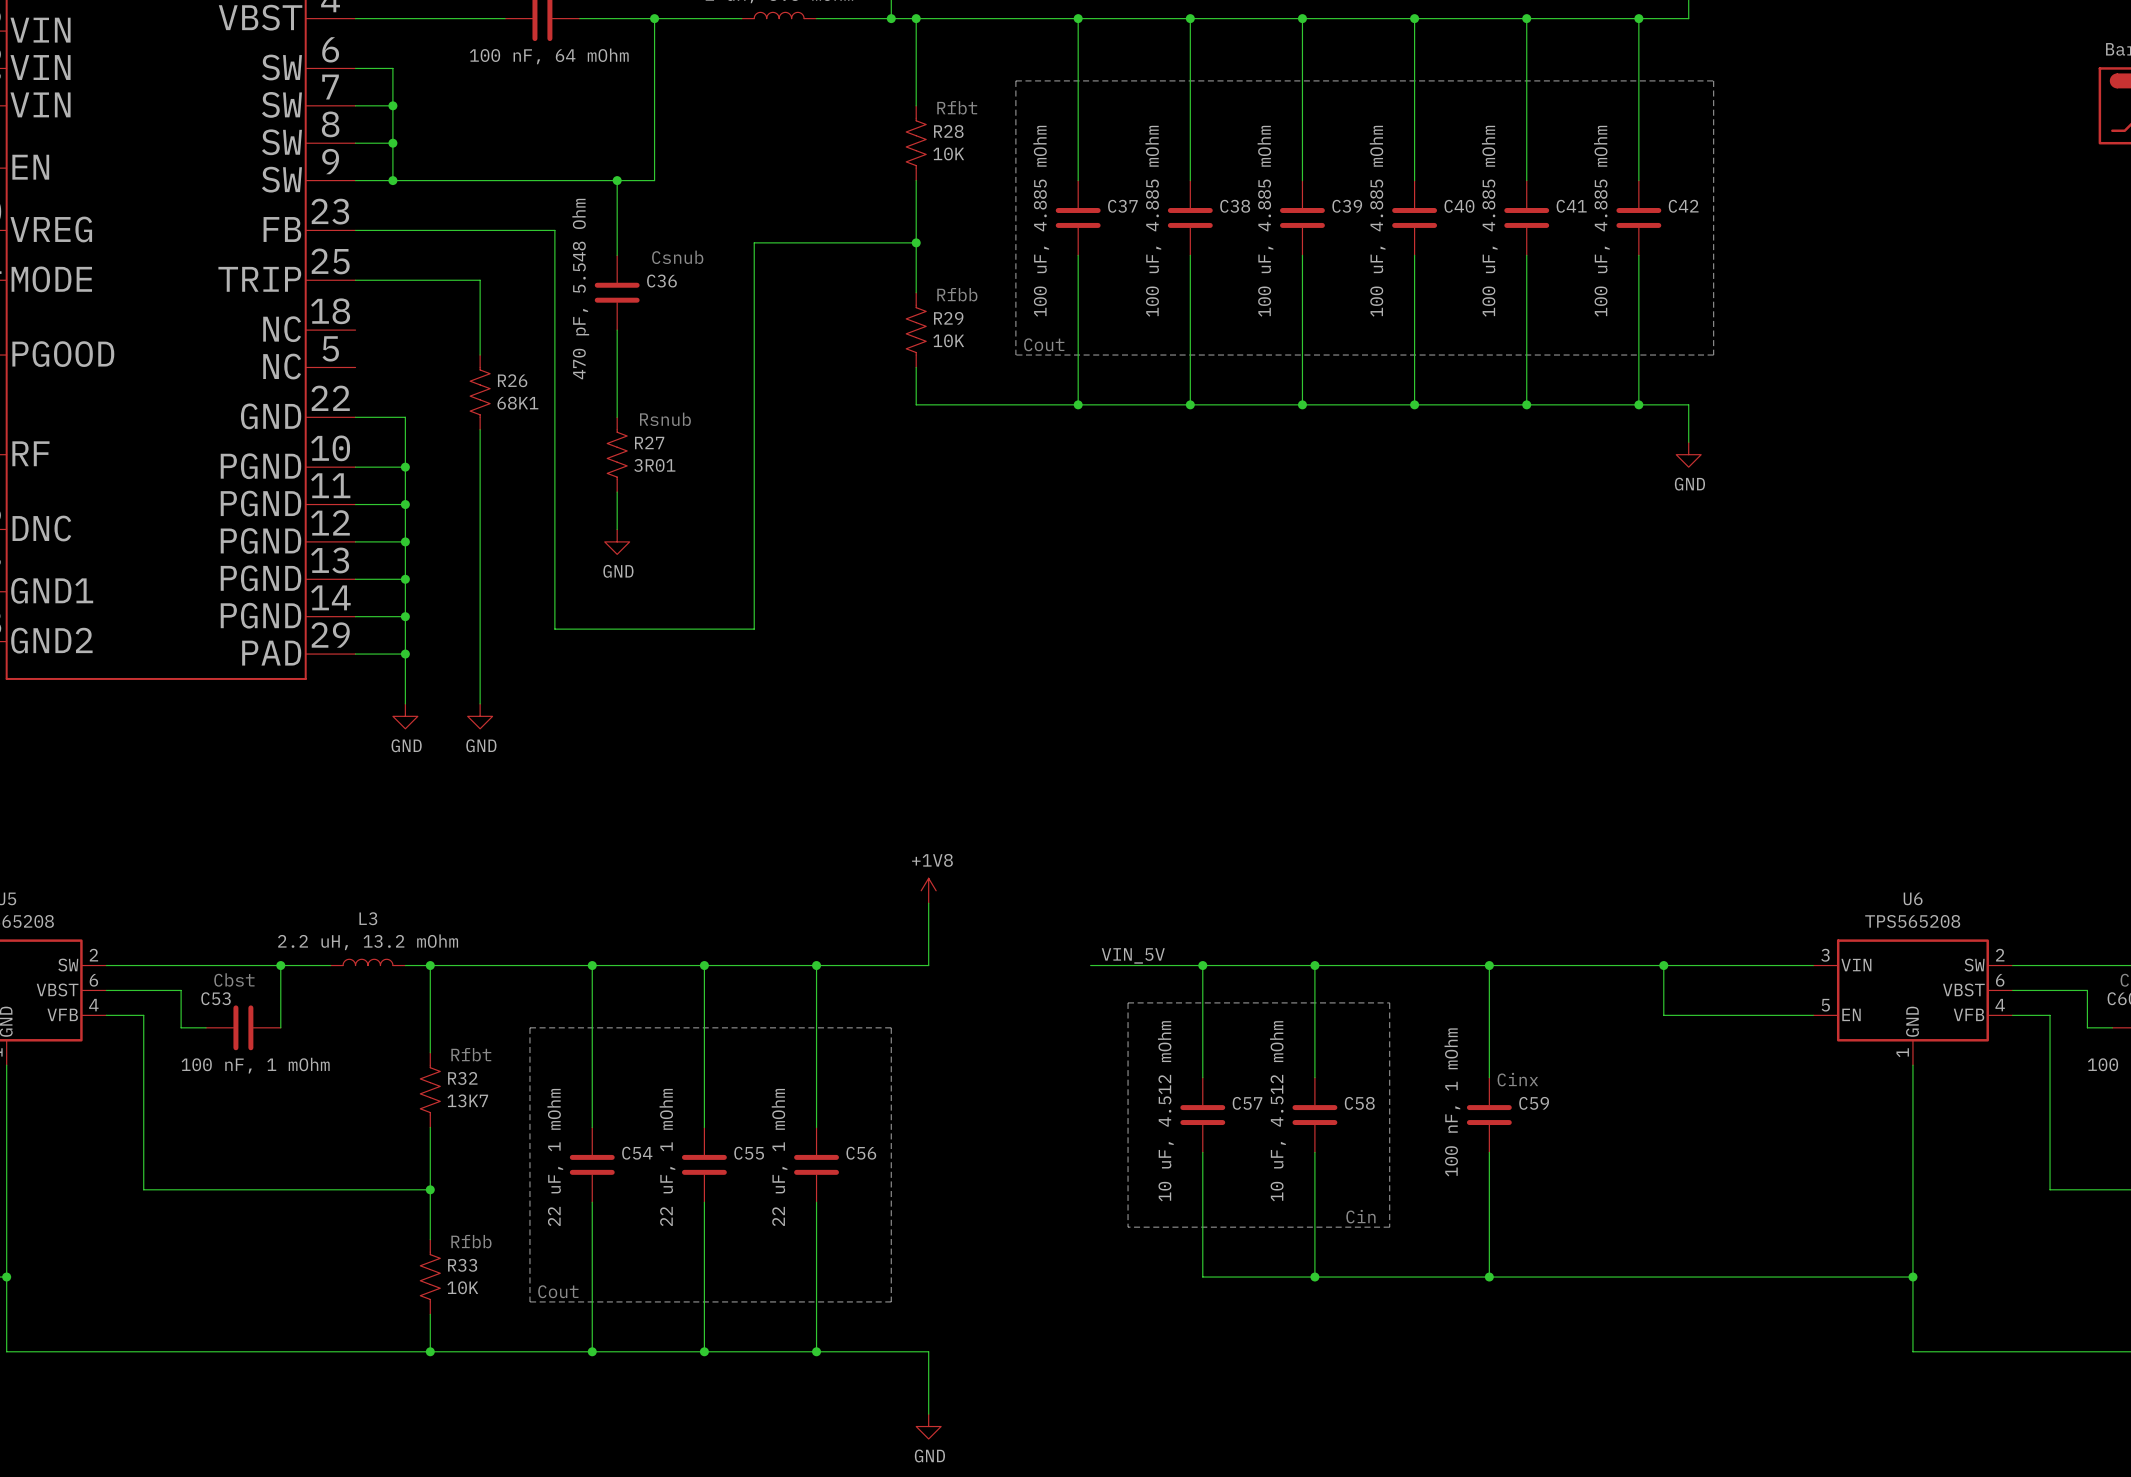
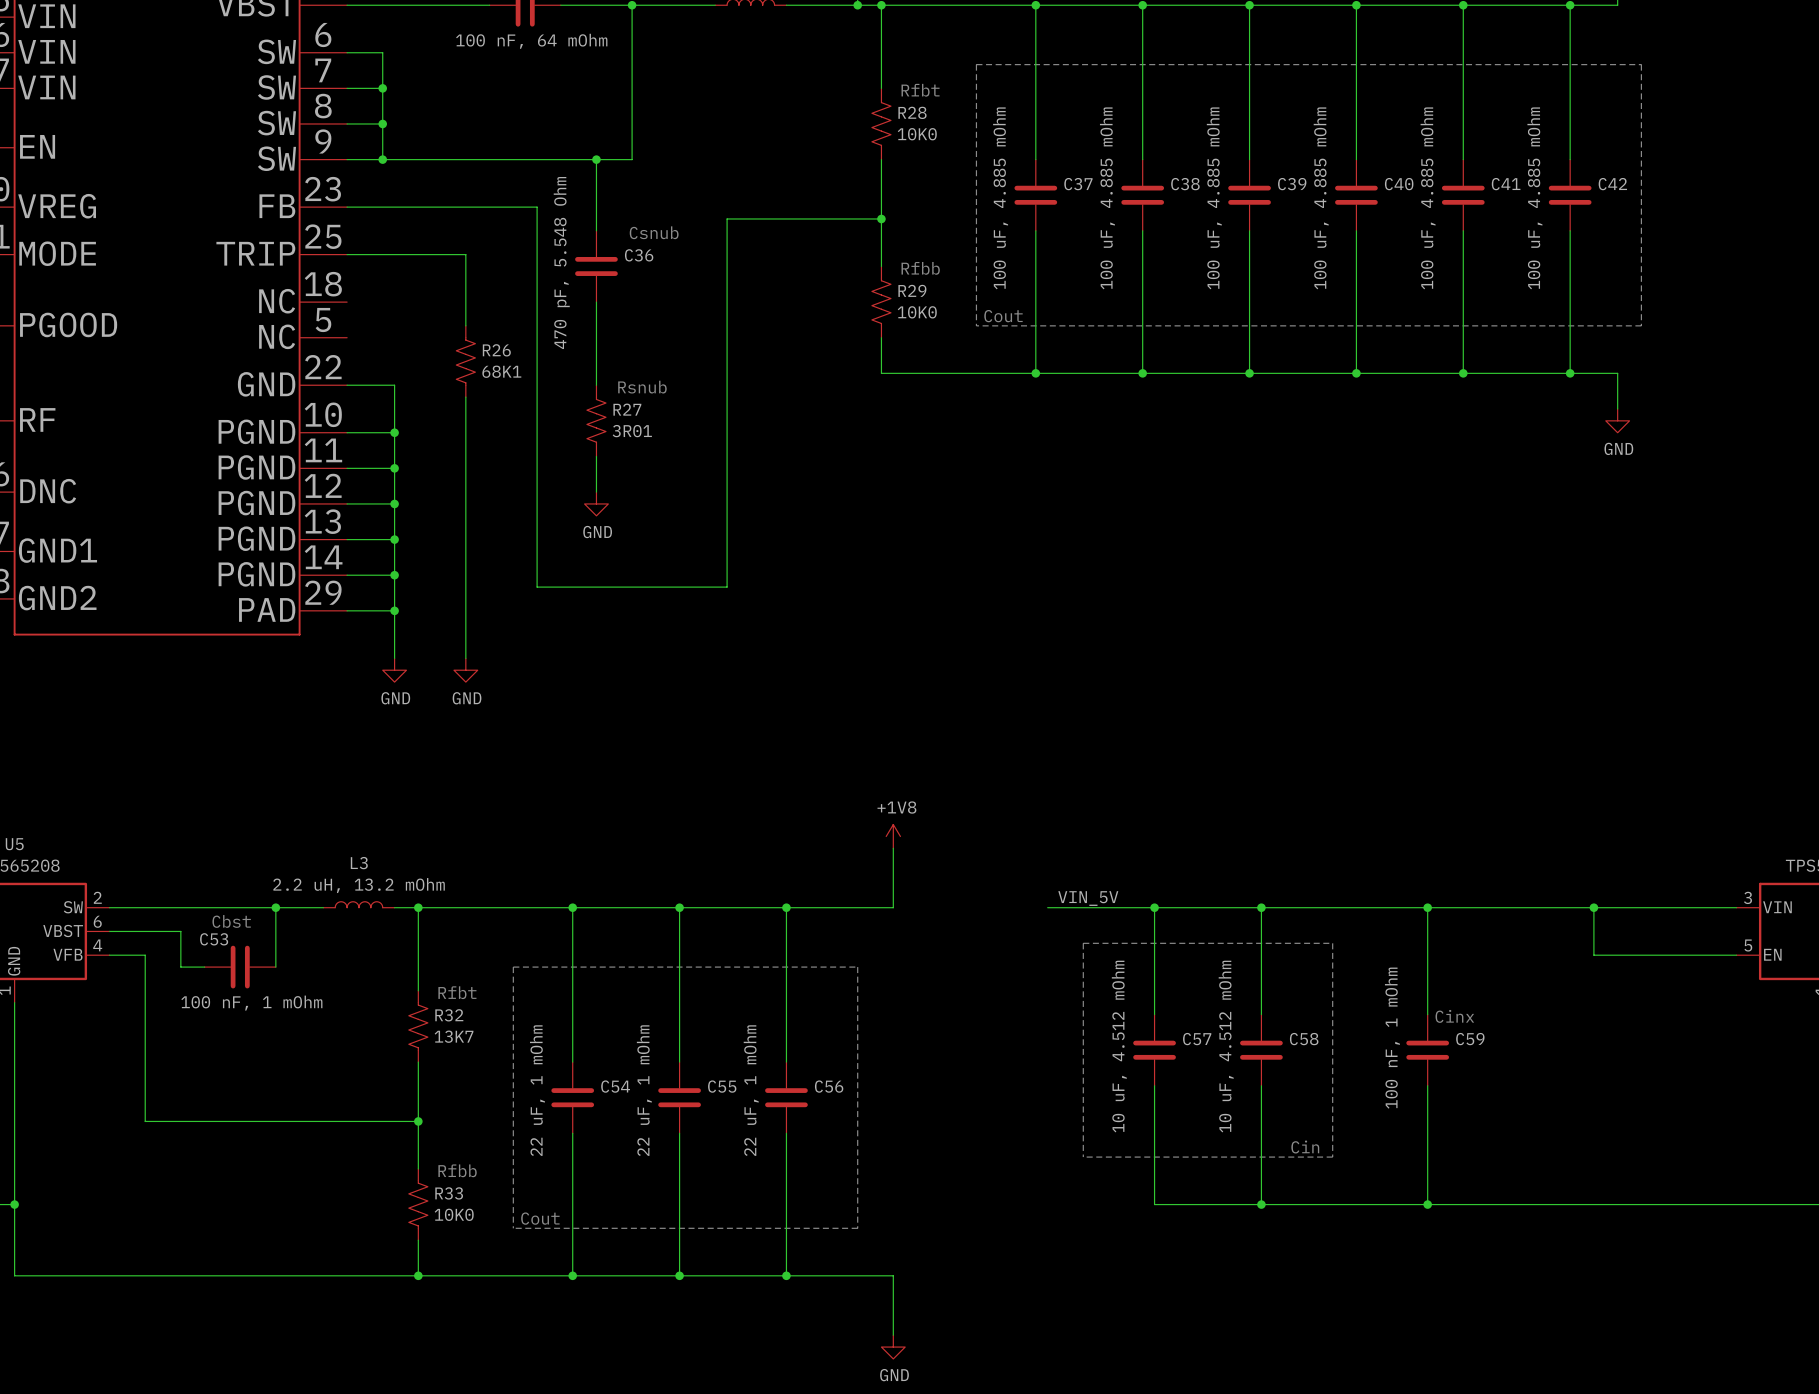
R28 value: 10K (948, 153) -> 10K0 (917, 134)
R29 value: 10K (948, 340) -> 10K0 (917, 312)
R33 value: 10K (462, 1287) -> 10K0 (454, 1214)

